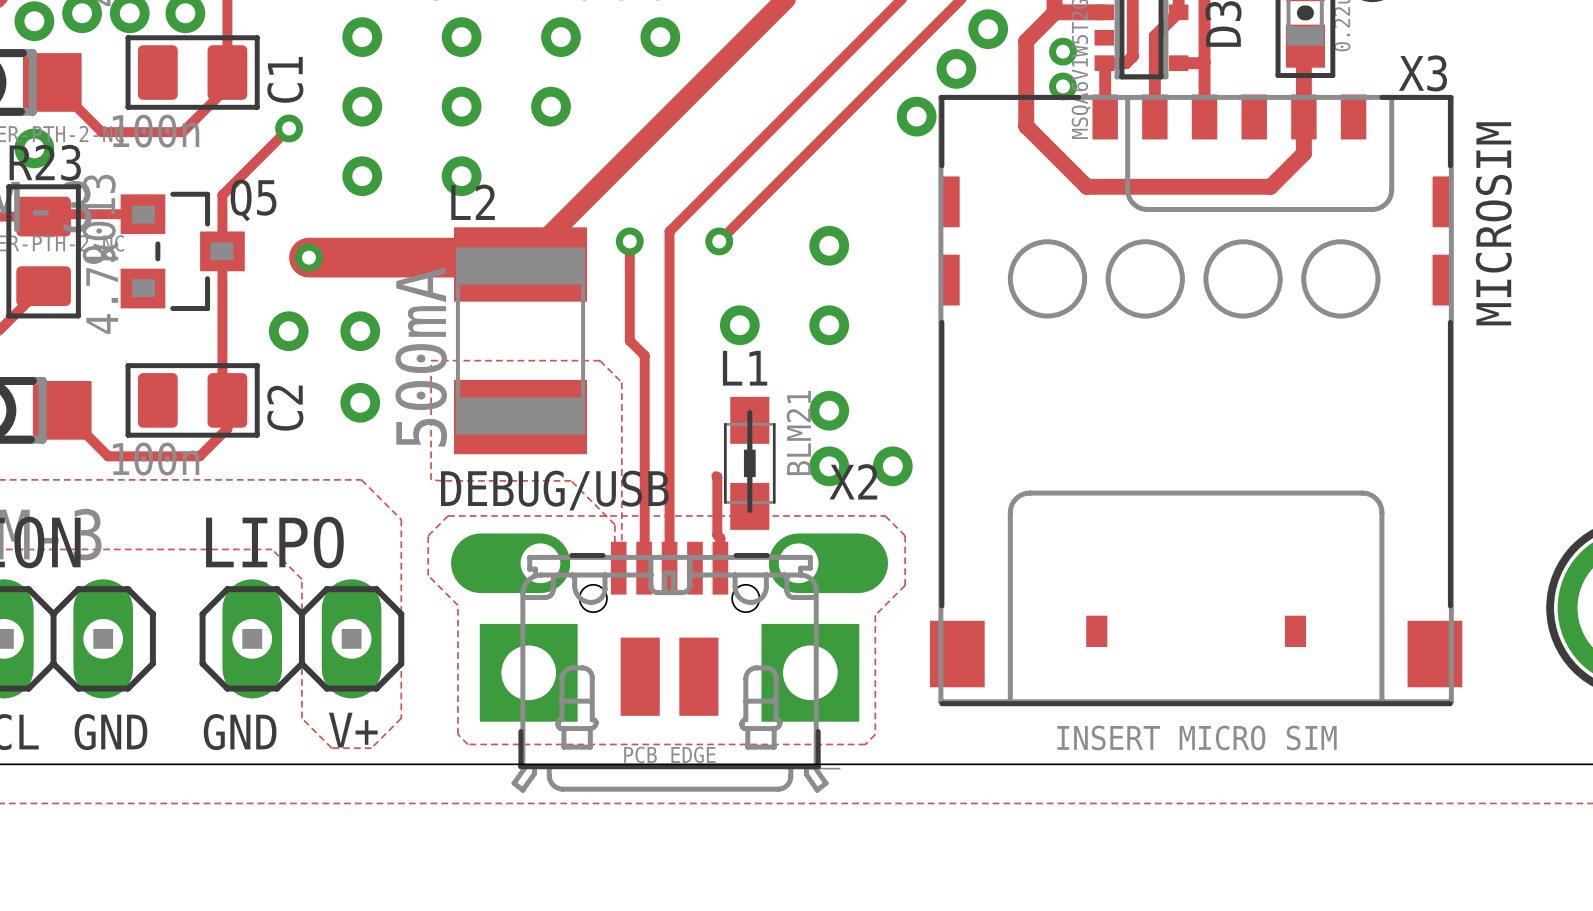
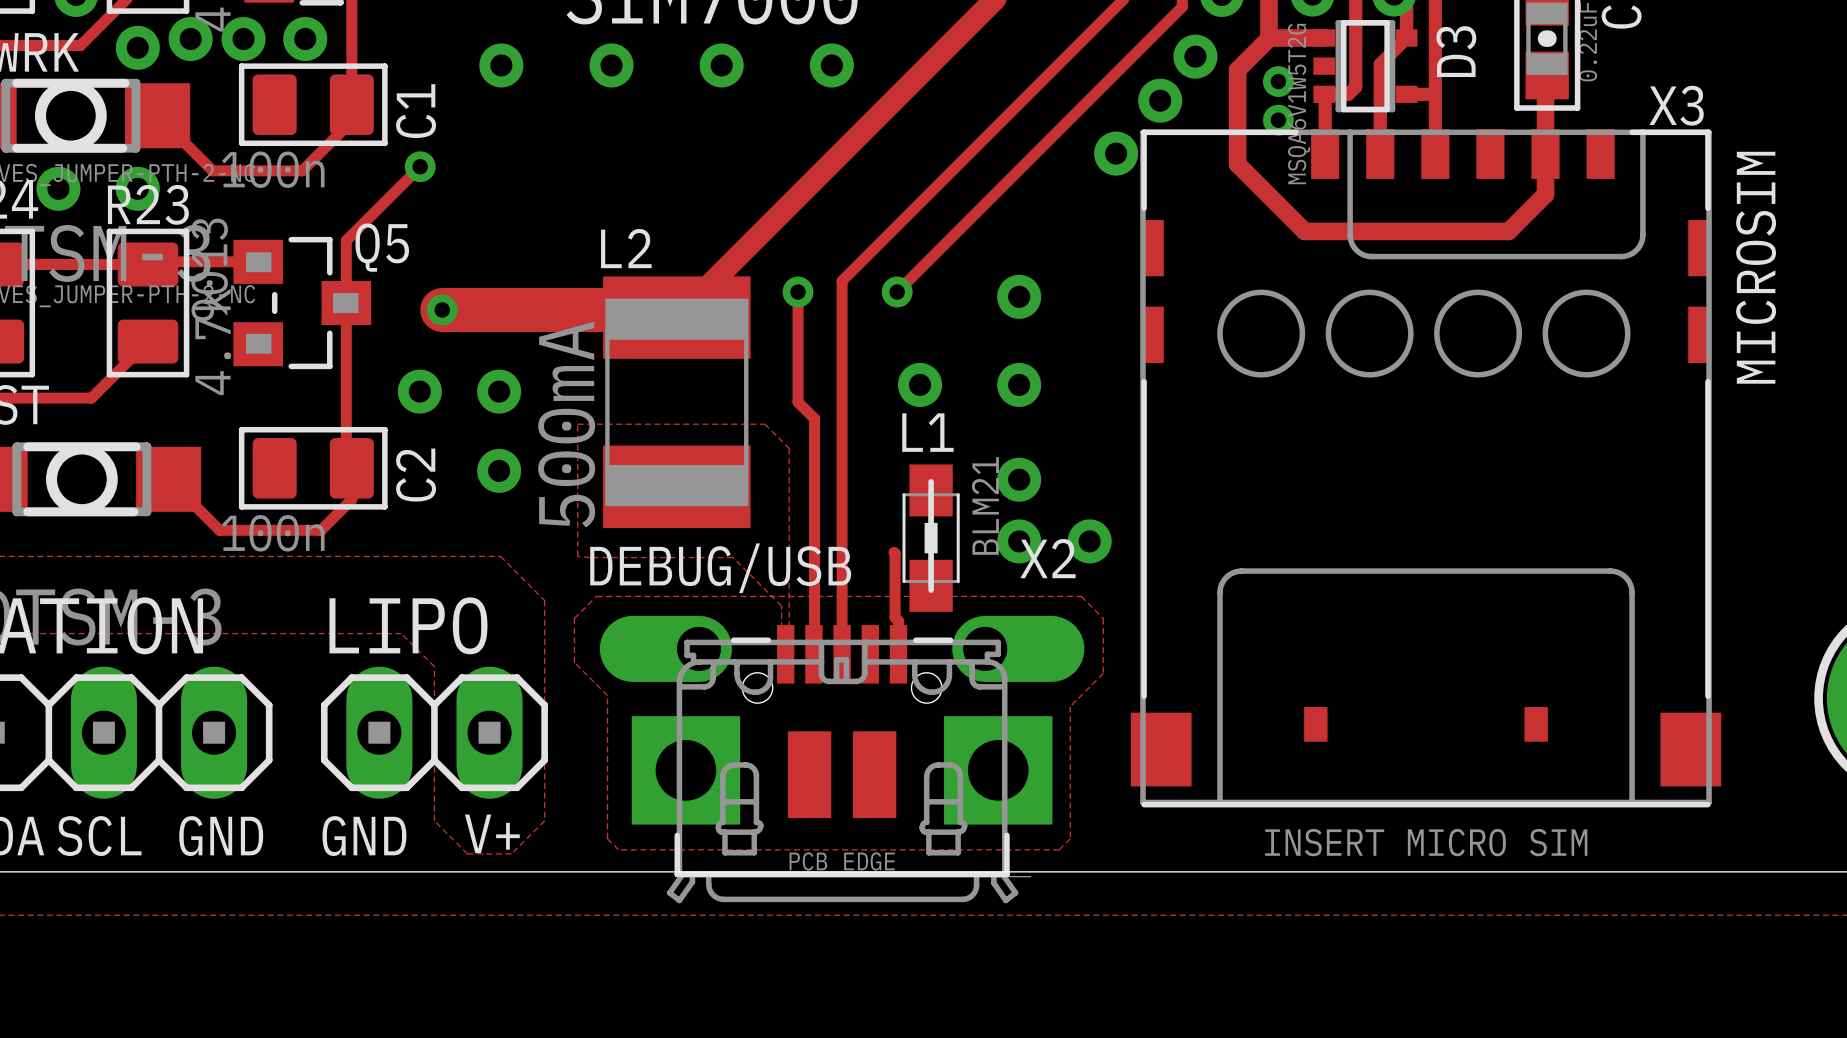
via: (362, 106) -> none
via: (461, 106) -> none
via: (551, 106) -> none
via: (362, 176) -> none
via: (461, 176) -> none

